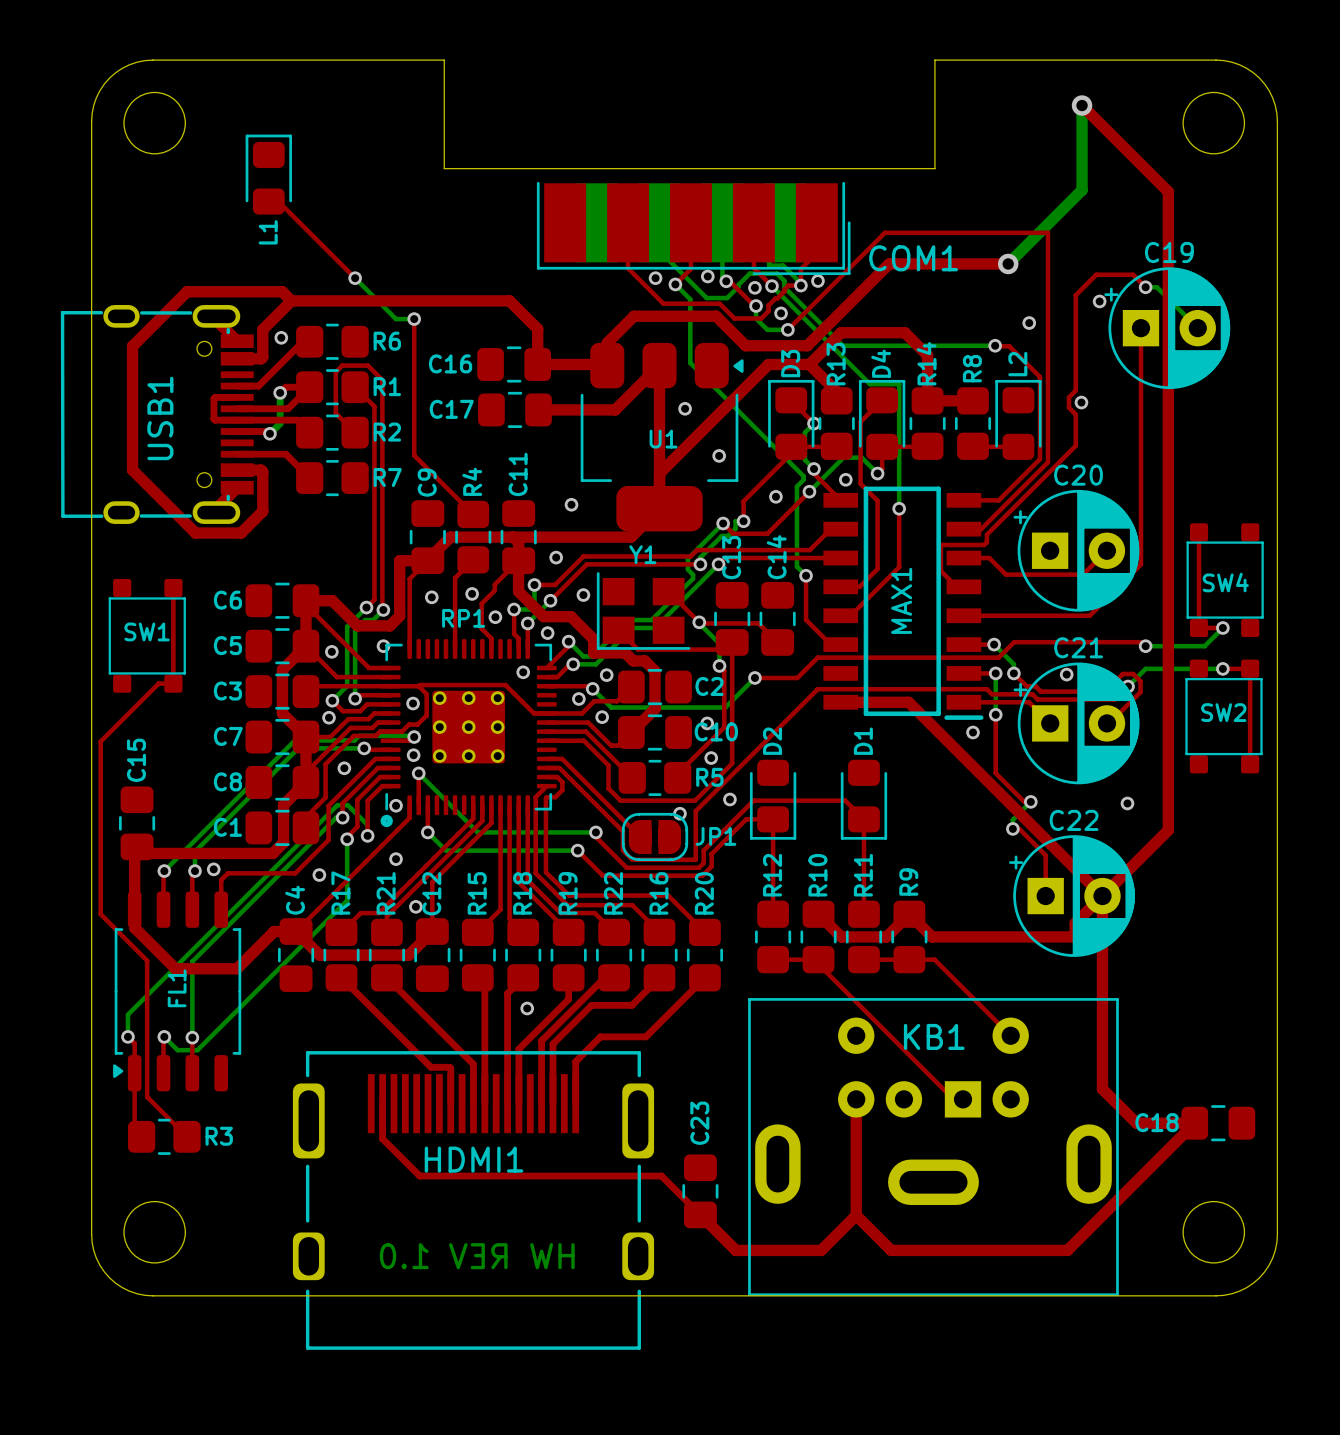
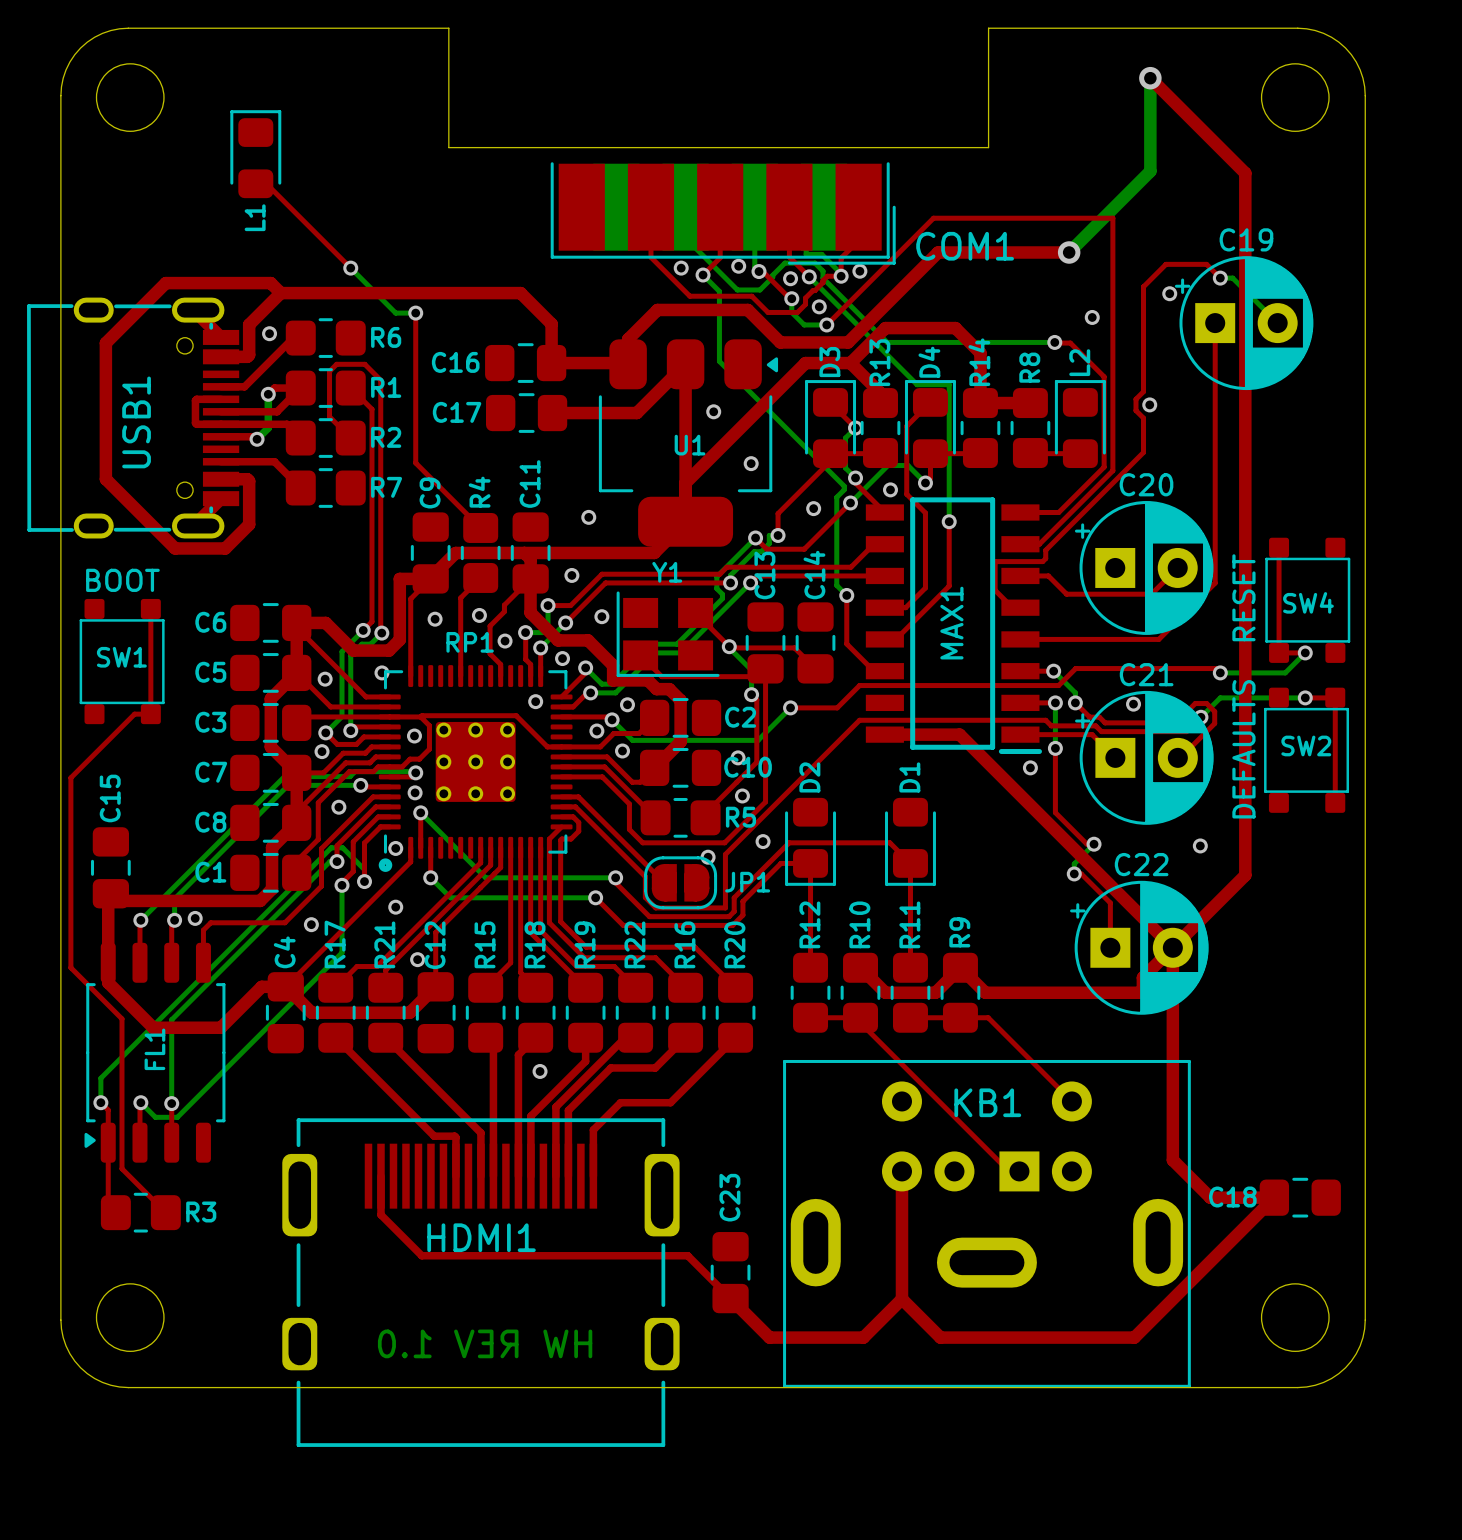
text: none -> BOOT (122, 580)
text: none -> RESET (1243, 597)
text: none -> DEFAULTS (1243, 749)

